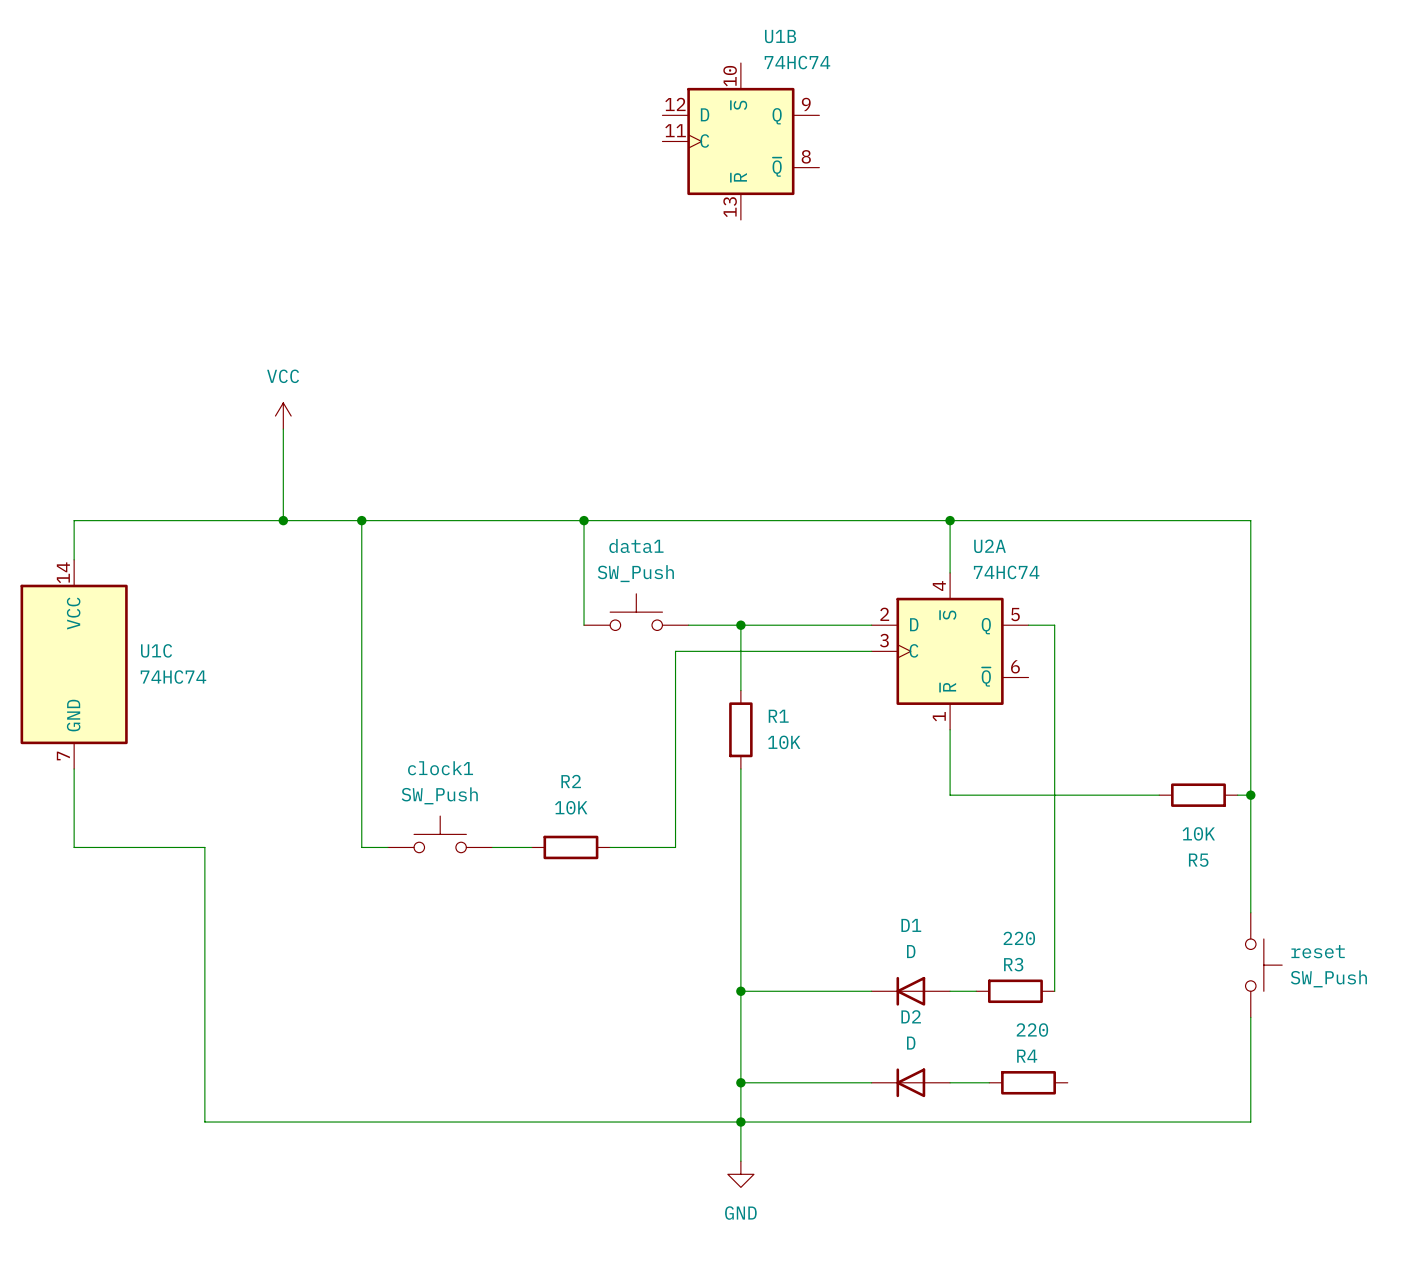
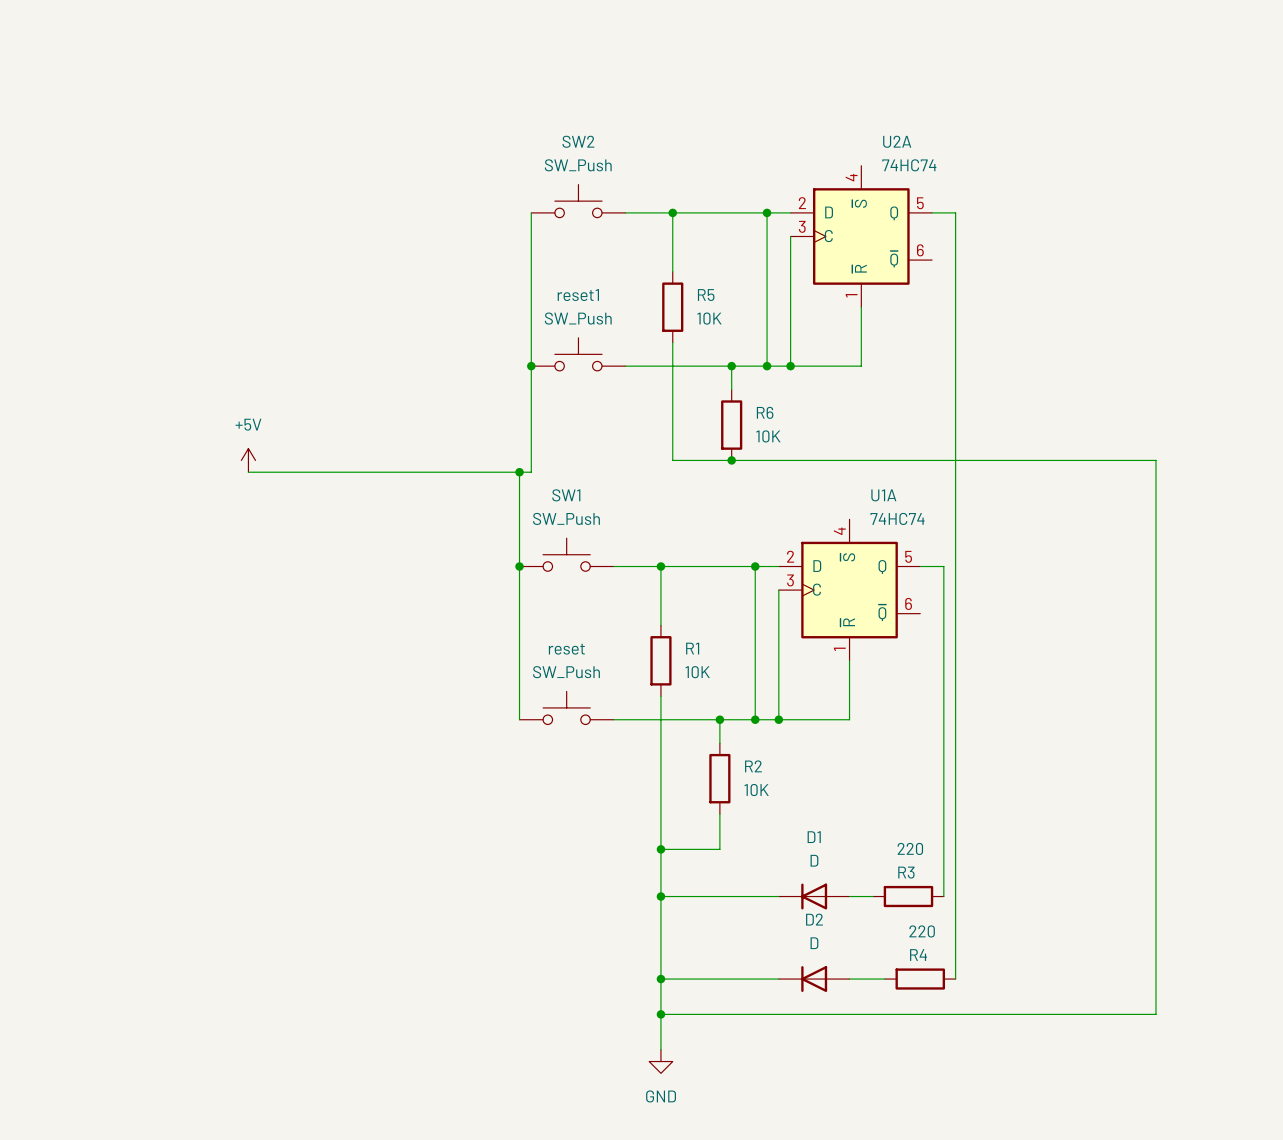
U1B: 74HC74 (740, 141) -> none
SW2: none -> SW_Push (578, 201)
wire: none -> (625, 212) (790, 212)
wire: none -> (672, 212) (672, 271)
junction: none -> (672, 212)
wire: none -> (767, 212) (767, 366)
junction: none -> (767, 212)
wire: none -> (932, 212) (955, 212) (955, 979)
wire: none -> (790, 236) (790, 366)
U2A: none -> 74HC74 (861, 236)
wire: none -> (861, 307) (861, 366) (625, 366)
reset1: none -> SW_Push (578, 354)
junction: none -> (531, 366)
wire: none -> (731, 366) (731, 389)
junction: none -> (731, 366)
junction: none -> (767, 366)
junction: none -> (790, 366)
power symbol: VCC (283, 416) -> none
wire: (283, 429) (283, 520) (74, 520) (74, 559) -> none
R6: none -> 10K (731, 425)
power symbol: none -> +5V (248, 460)
junction: none -> (731, 460)
junction: (283, 520) -> none
wire: (361, 520) (361, 847) (387, 847) -> none
junction: (361, 520) -> none
wire: (597, 520) (1250, 520) (1250, 912) -> (531, 472) (531, 212)
wire: (950, 520) (950, 572) -> none
junction: (950, 520) -> none
data1 name: data1 (636, 546) -> SW1 (566, 495)
U2A name: U2A (989, 546) -> U1A (883, 495)
wire: none -> (519, 566) (519, 719)
junction: none -> (519, 566)
wire: none -> (755, 566) (755, 719)
junction: none -> (755, 566)
wire: (871, 651) (675, 651) (675, 847) (610, 847) -> (778, 590) (778, 719)
U1C: 74HC74 (74, 664) -> none
wire: (74, 769) (74, 847) (204, 847) (204, 1122) (740, 1122) -> none
R2 name position: R2 (571, 781) -> R2 (753, 766)
reset: none -> SW_Push (566, 707)
wire: none -> (719, 719) (719, 743)
junction: none -> (719, 719)
junction: none -> (755, 719)
junction: none -> (778, 719)
wire: (950, 795) (1159, 795) -> (849, 719) (613, 719)
R5 rotation: 0° (1198, 795) -> 90° clockwise (672, 307)
R5 position: (1198, 795) -> (672, 307)
wire: (1237, 795) (1250, 795) -> none
junction: (1250, 795) -> none
R5 value position: 10K (1198, 833) -> 10K (709, 318)
clock1: SW_Push (440, 834) -> none
wire: (492, 847) (531, 847) -> none
R2 rotation: 0° (570, 847) -> 90° clockwise (719, 778)
R2 position: (570, 847) -> (719, 778)
R5 name position: R5 (1198, 860) -> R5 (706, 295)
wire: none -> (719, 814) (719, 849) (660, 849)
junction: none -> (660, 849)
reset: SW_Push (1263, 965) -> none
wire: (1250, 1017) (1250, 1122) -> (672, 342) (672, 460) (1155, 460) (1155, 1014) (1120, 1014)

